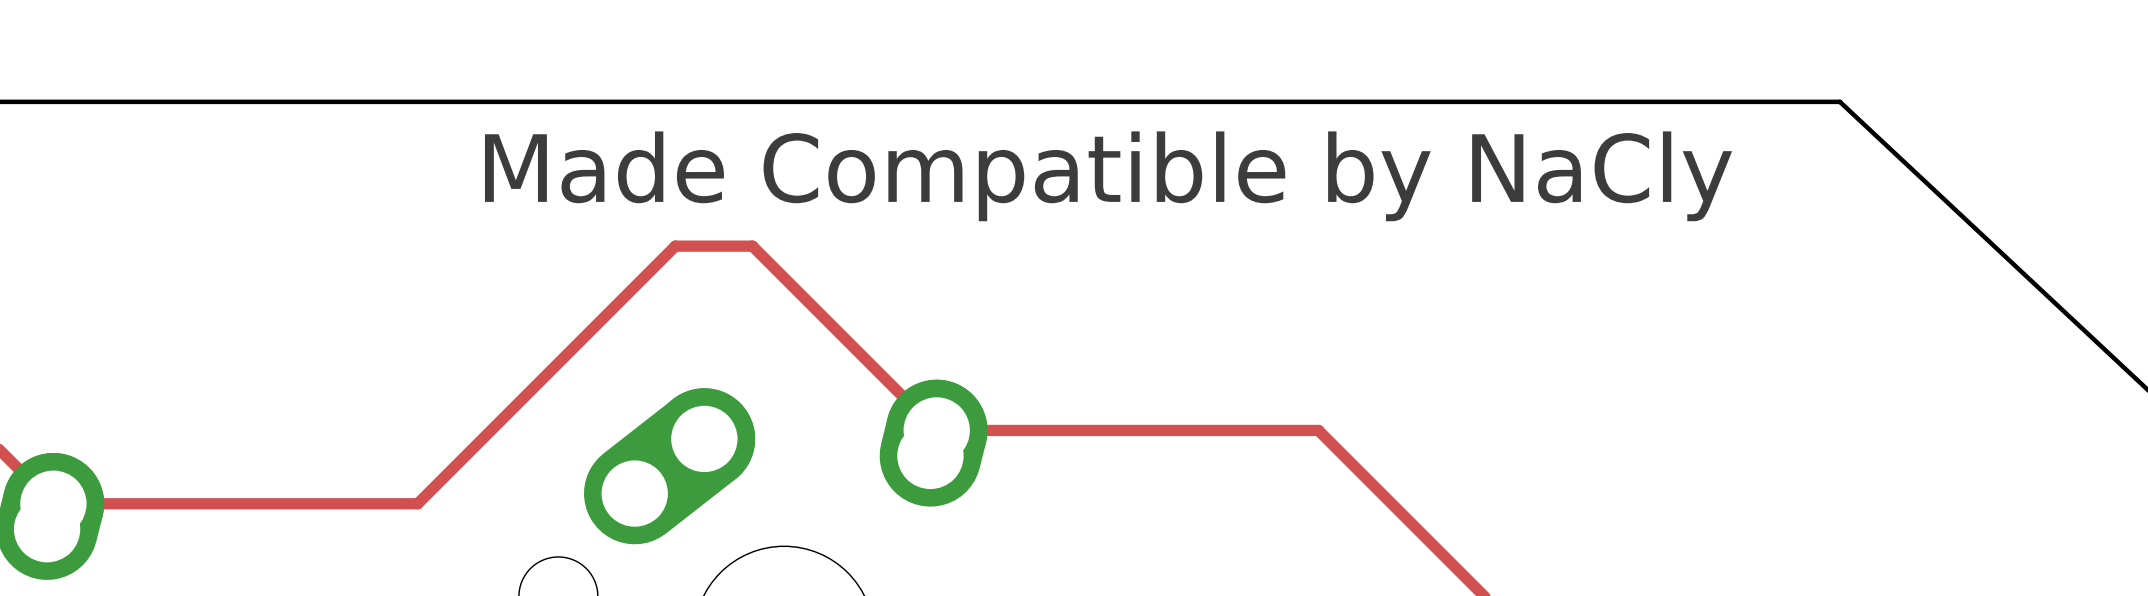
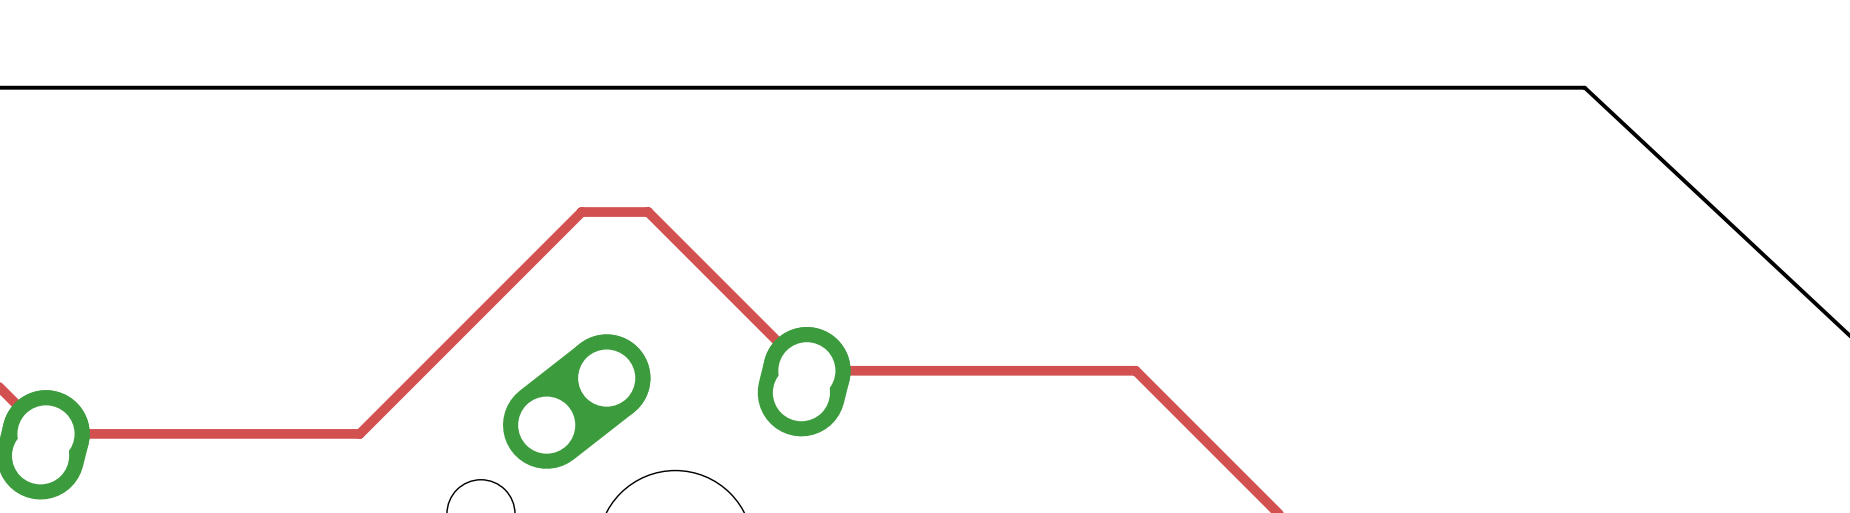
text: Made Compatible by NaCly (1108, 176) -> none

